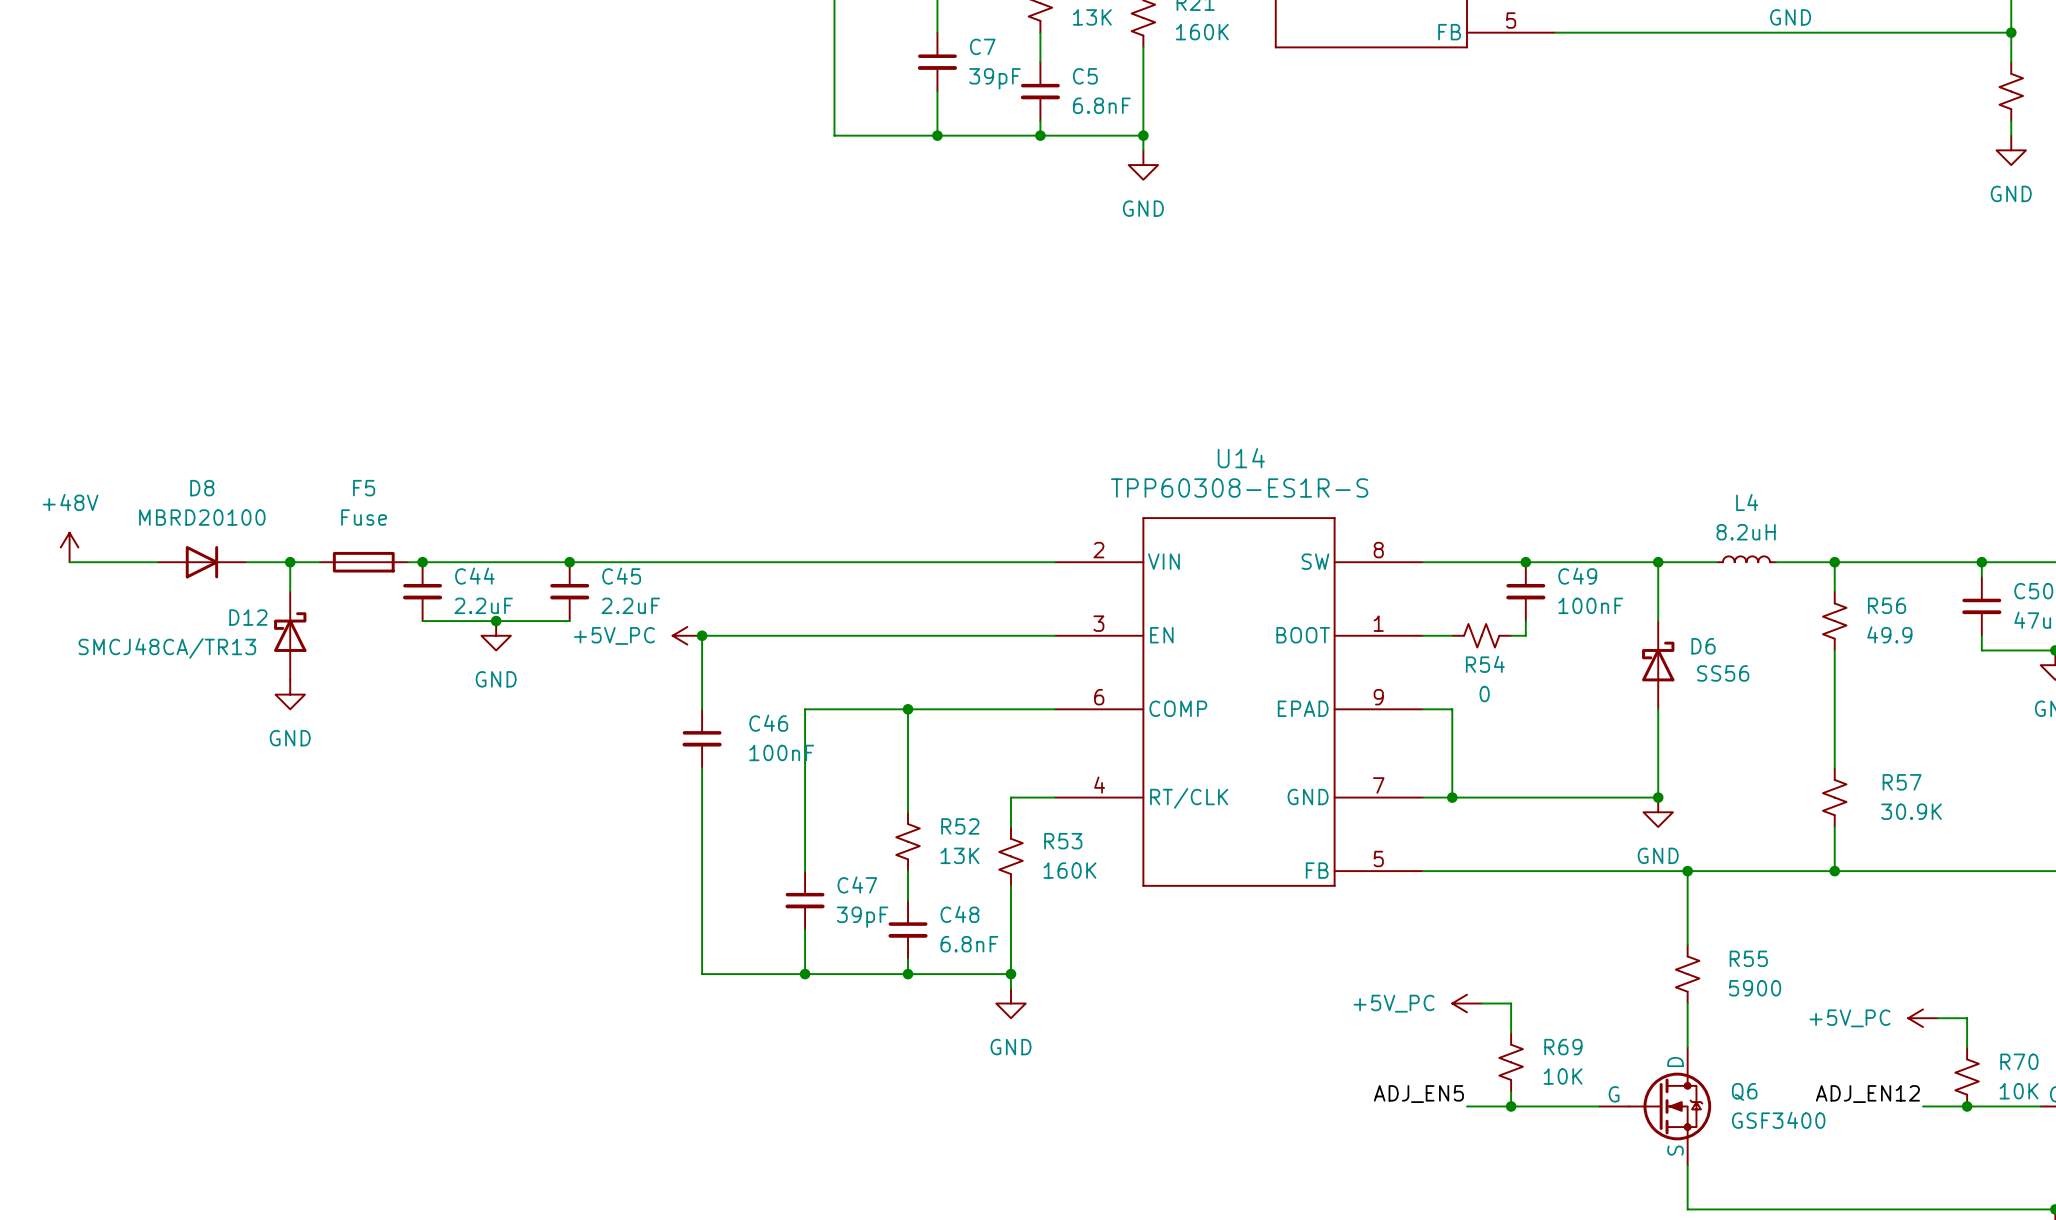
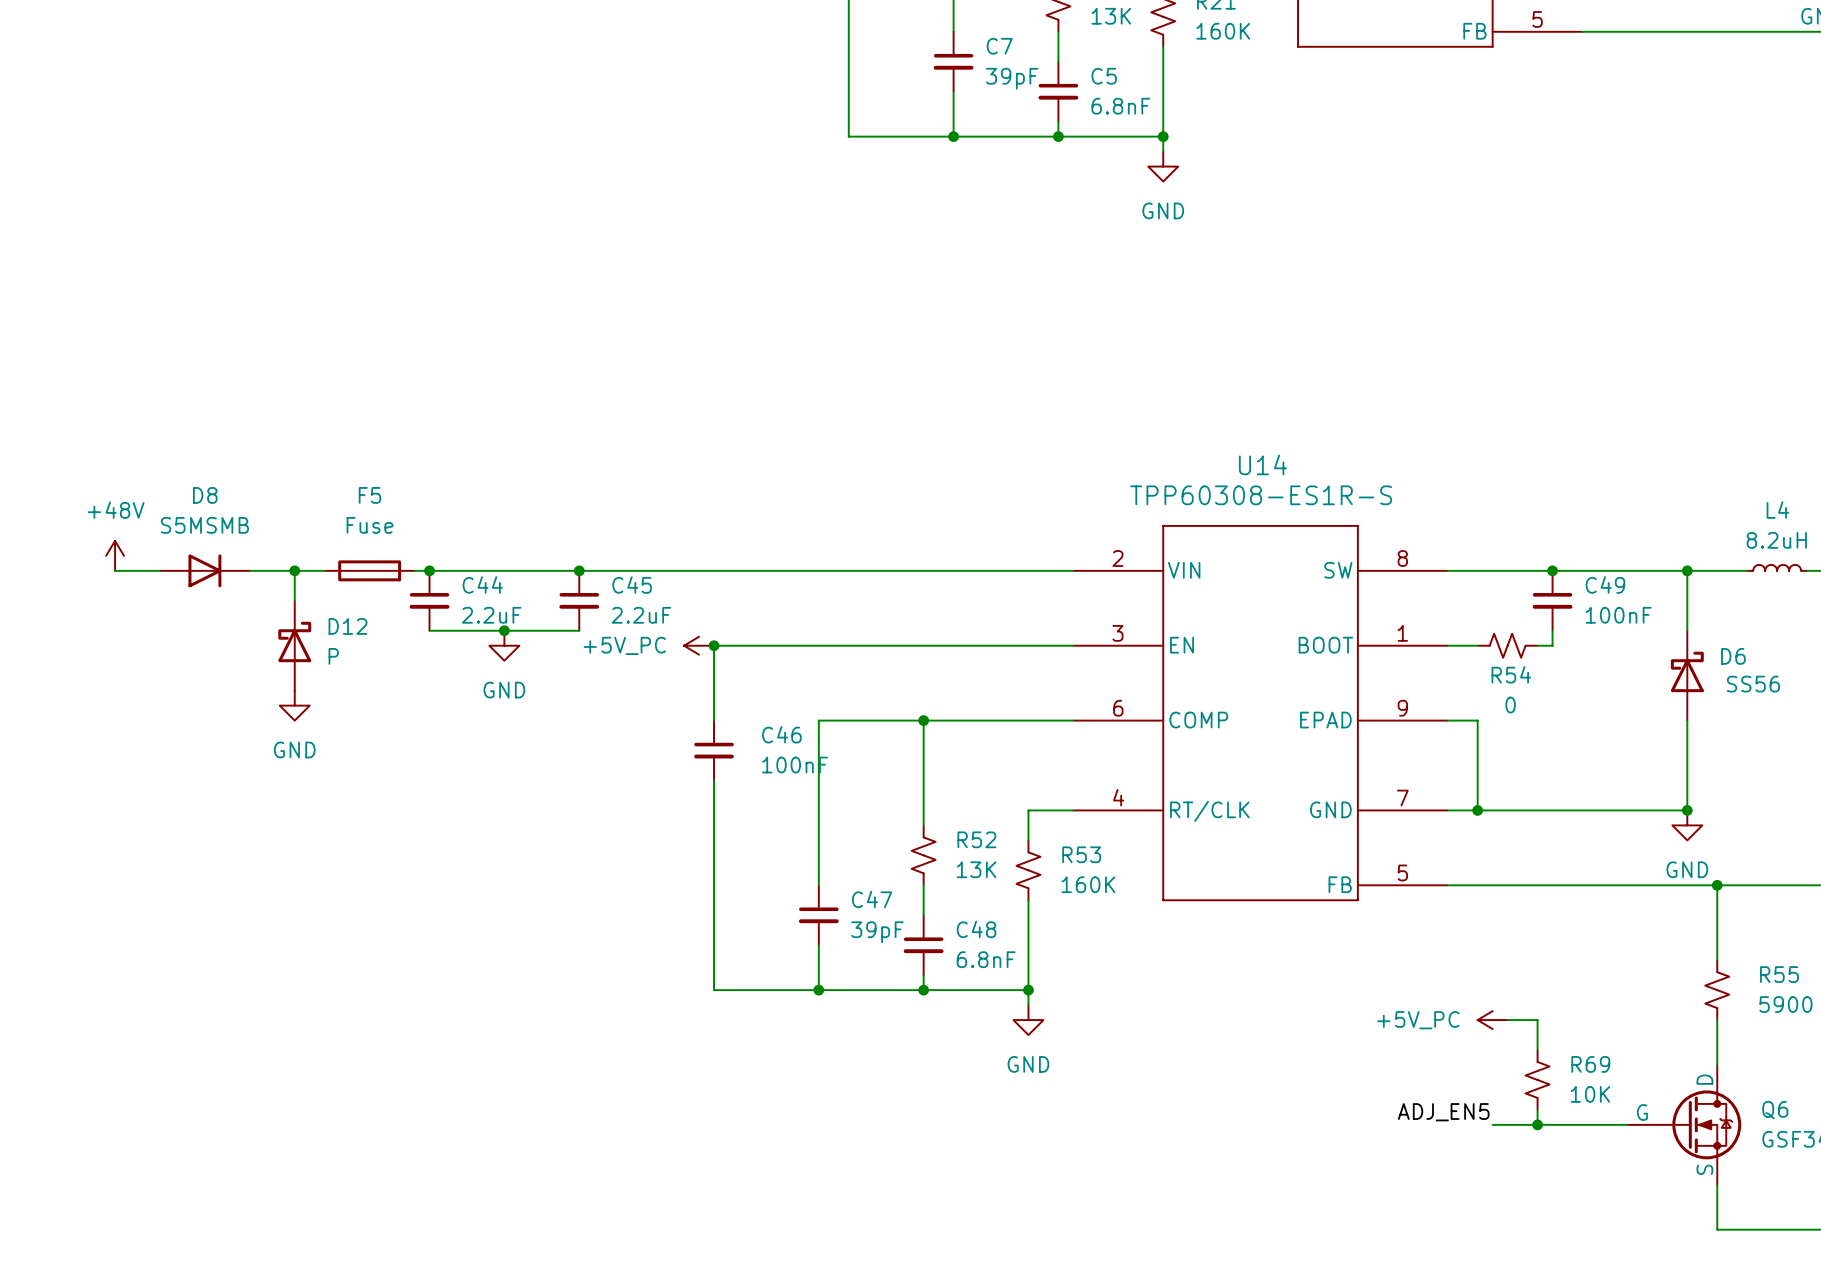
D8 value: MBRD20100 (202, 517) -> S5MSMB (204, 525)
power symbol position: +48V (69, 547) -> +48V (115, 555)
wire: (69, 562) (113, 562) -> none
D12 name position: D12 (248, 617) -> D12 (347, 626)
D12 value: SMCJ48CA/TR13 (167, 648) -> P (333, 656)

